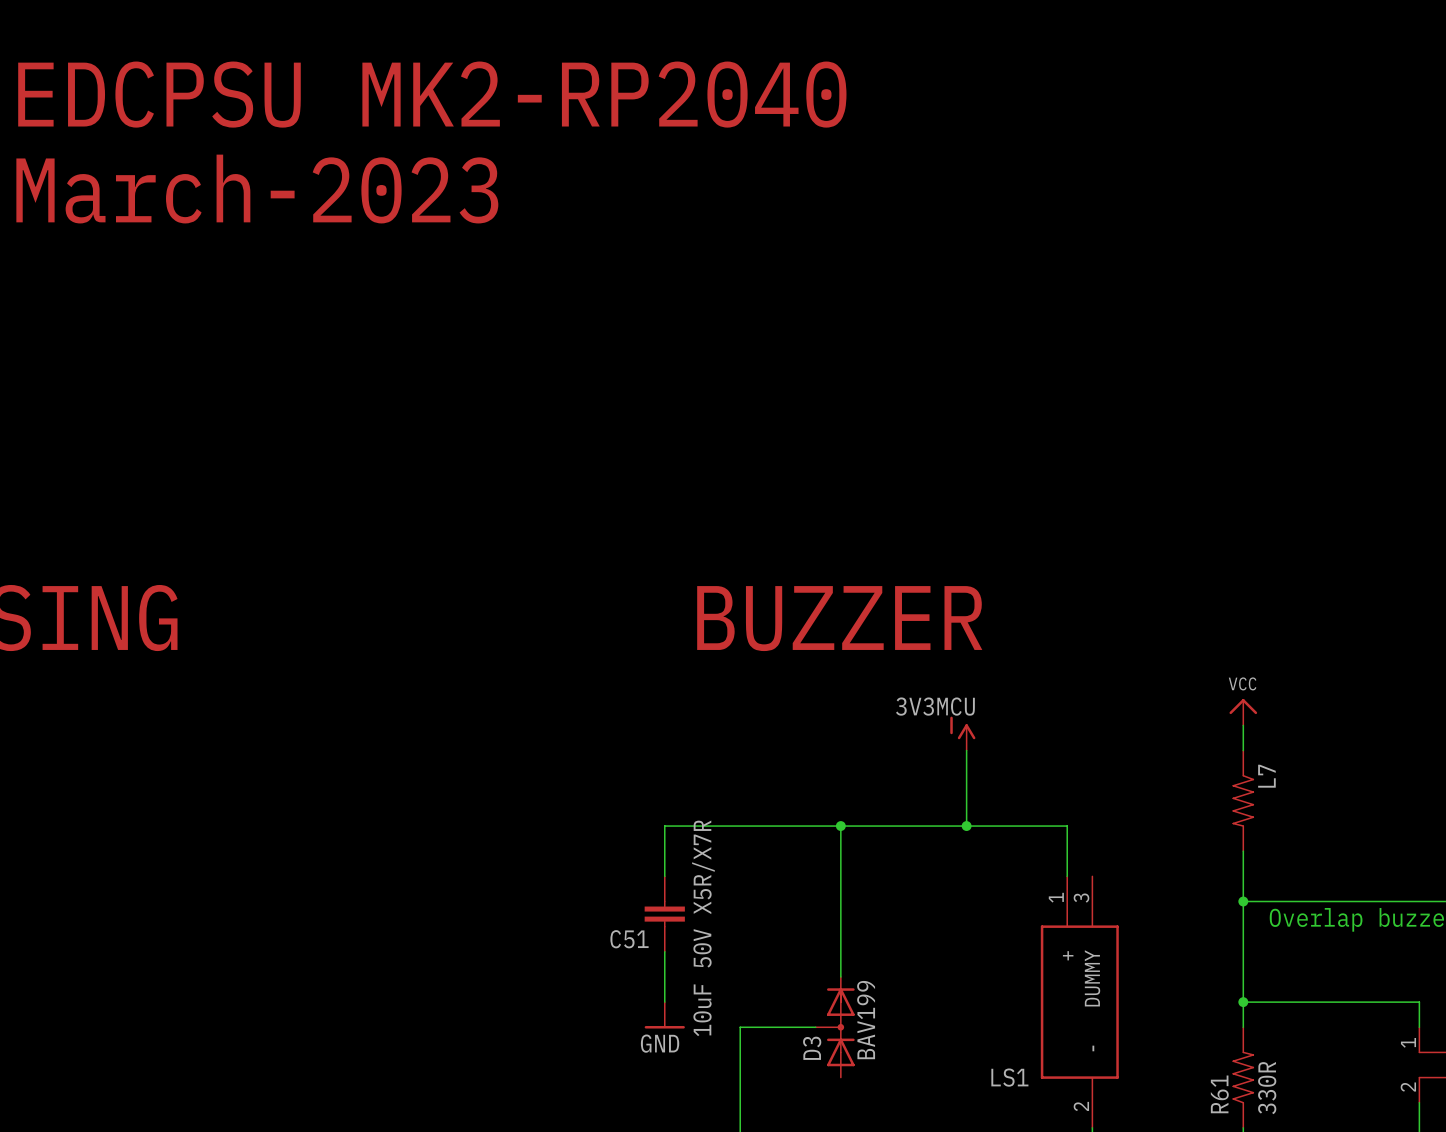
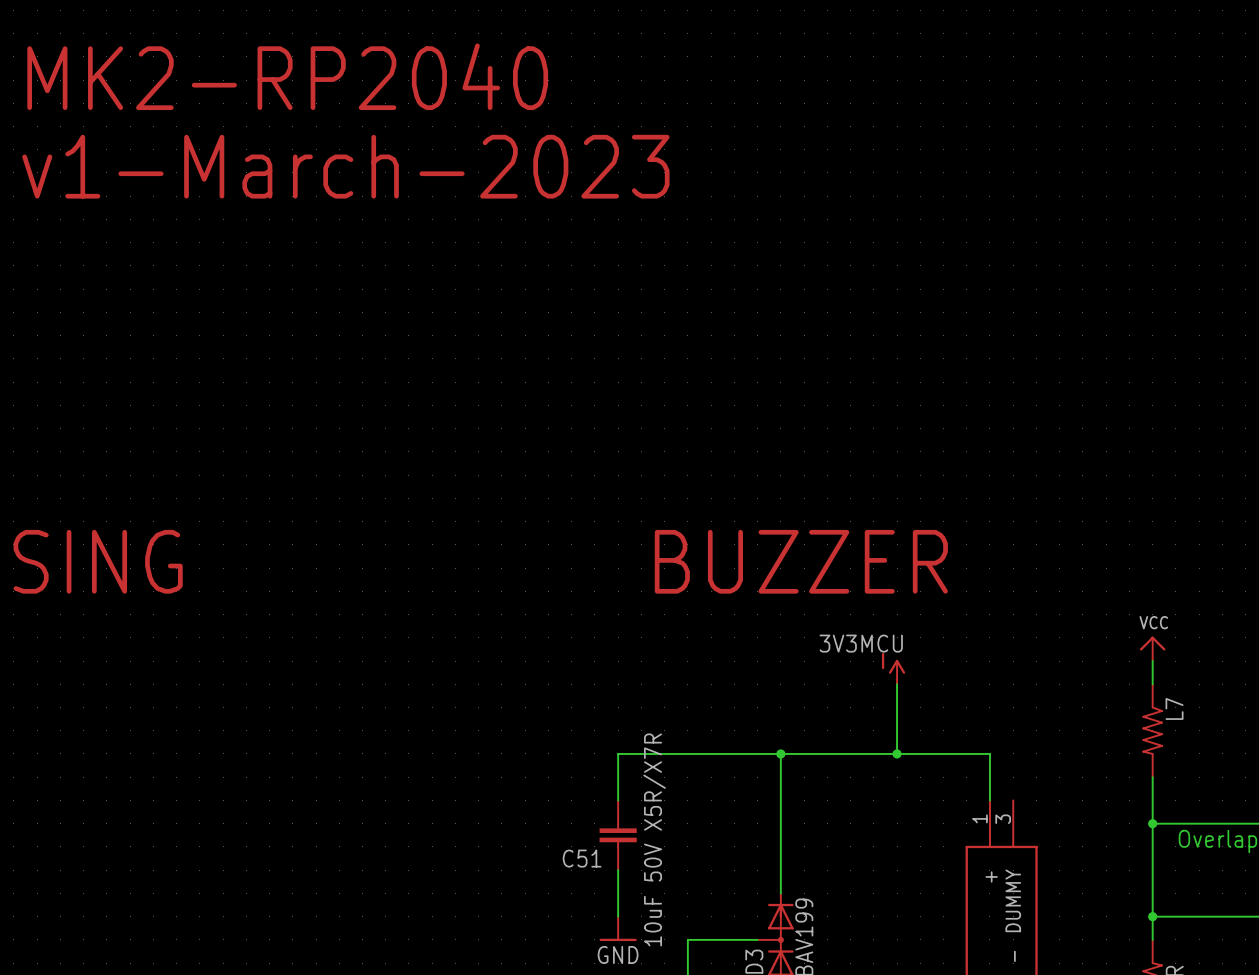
text: EDCPSU MK2-RP2040 (432, 94) -> MK2-RP2040 (287, 76)
text: March-2023 (257, 189) -> v1-March-2023 (345, 166)

